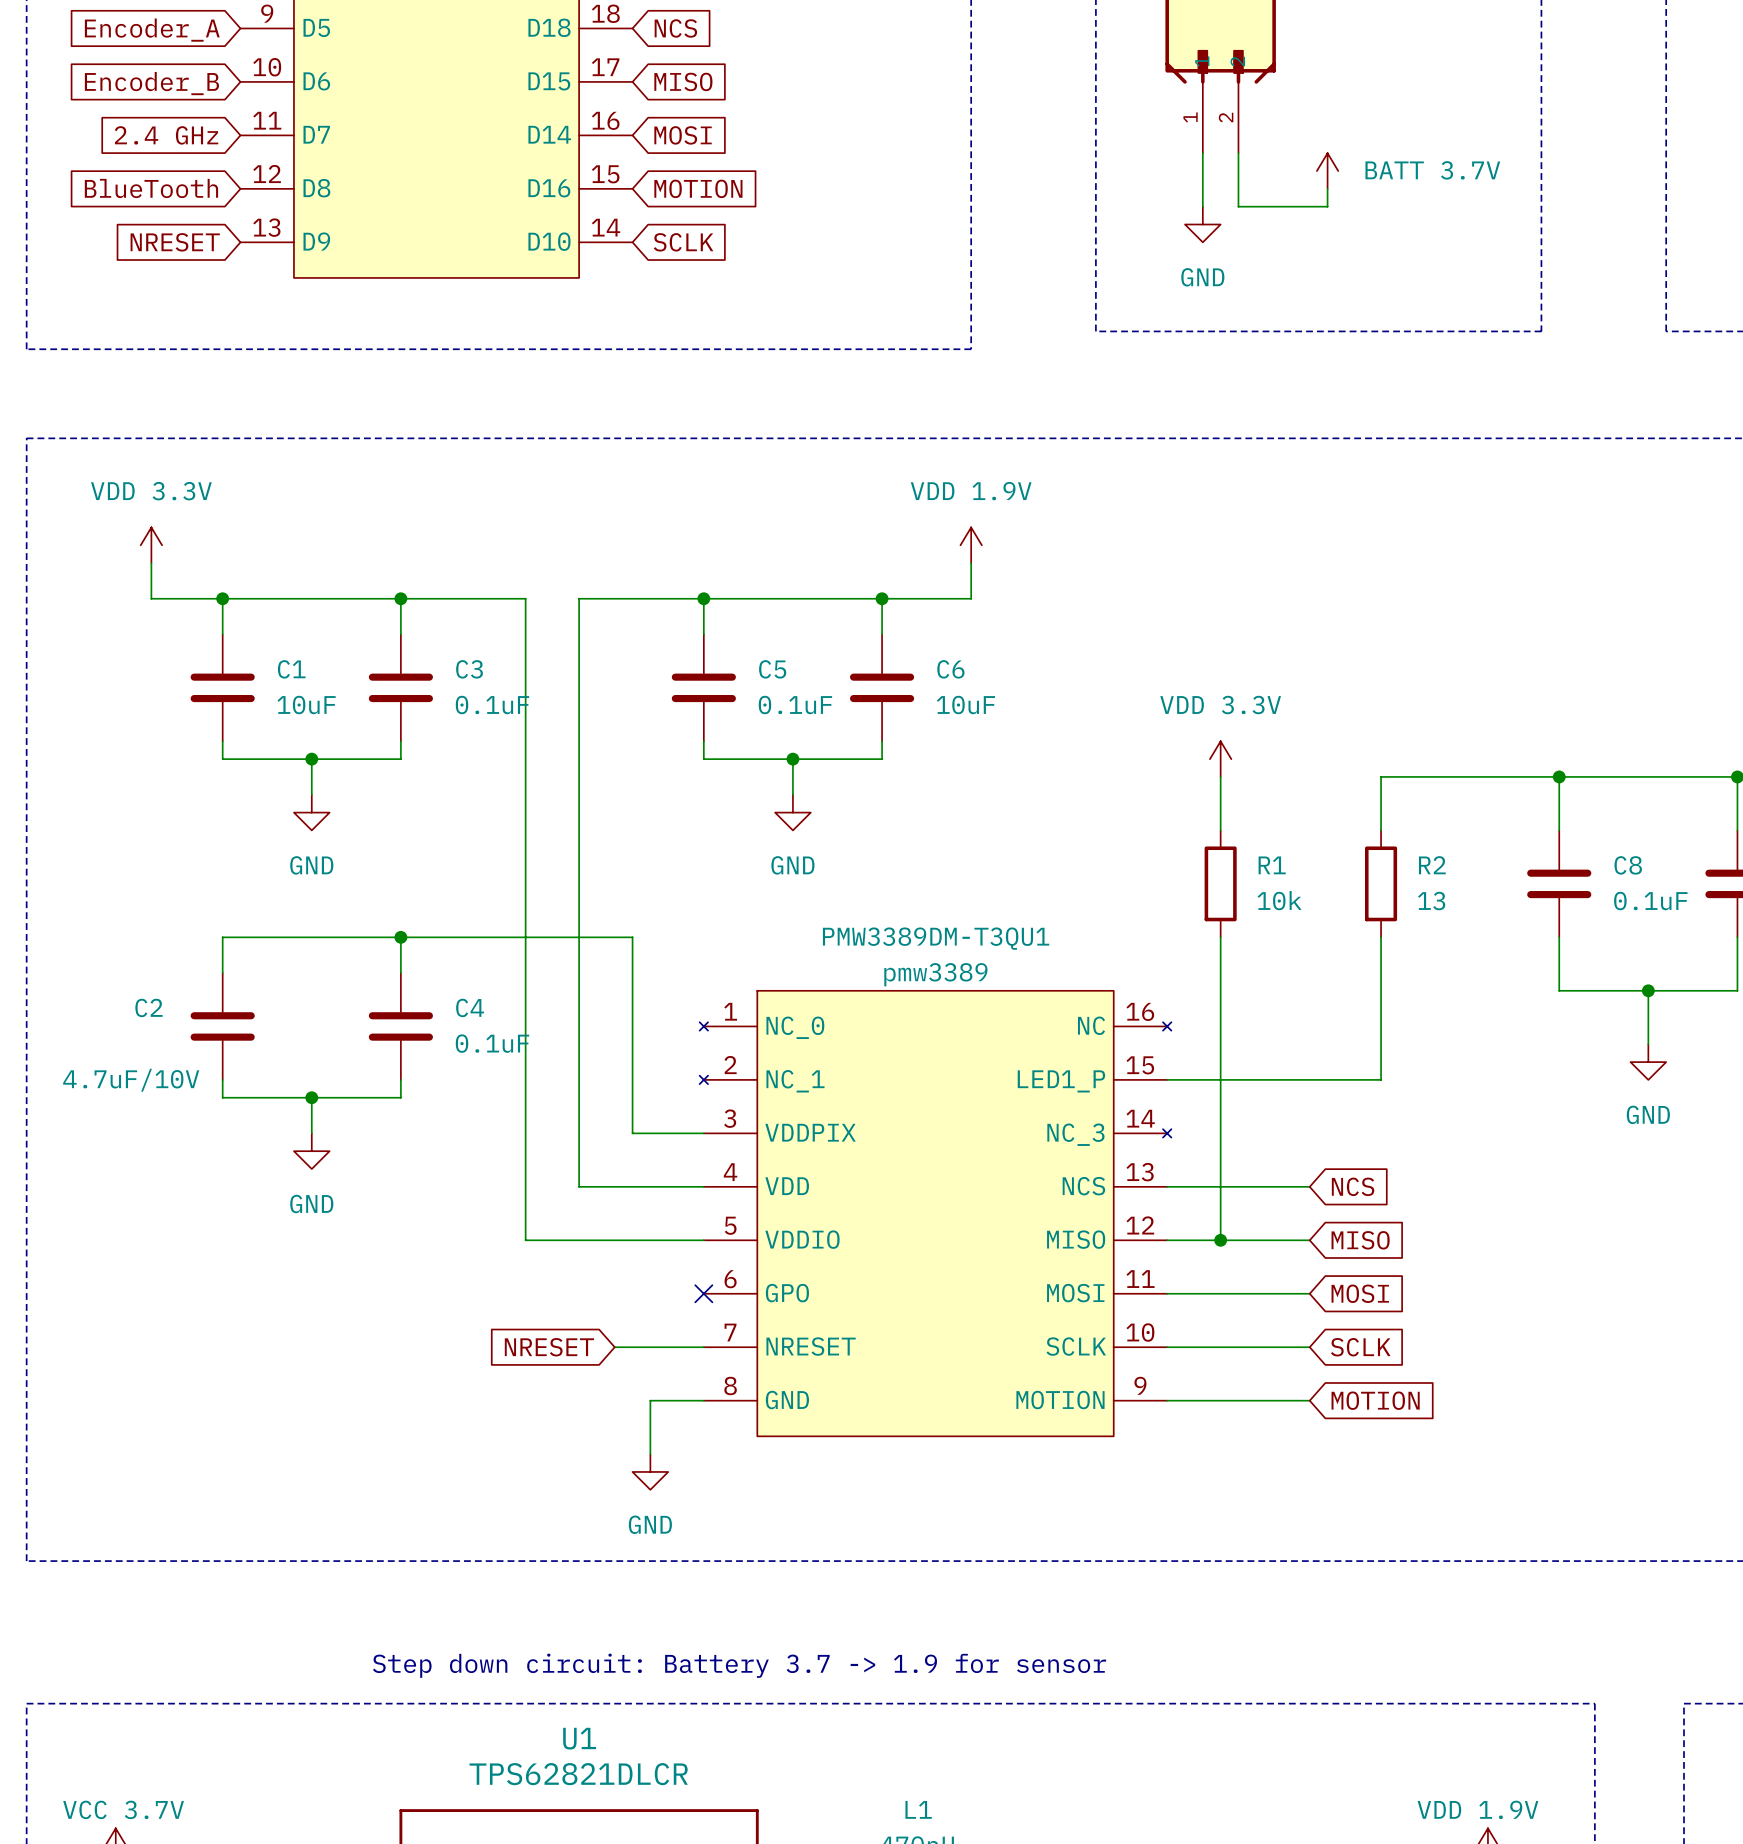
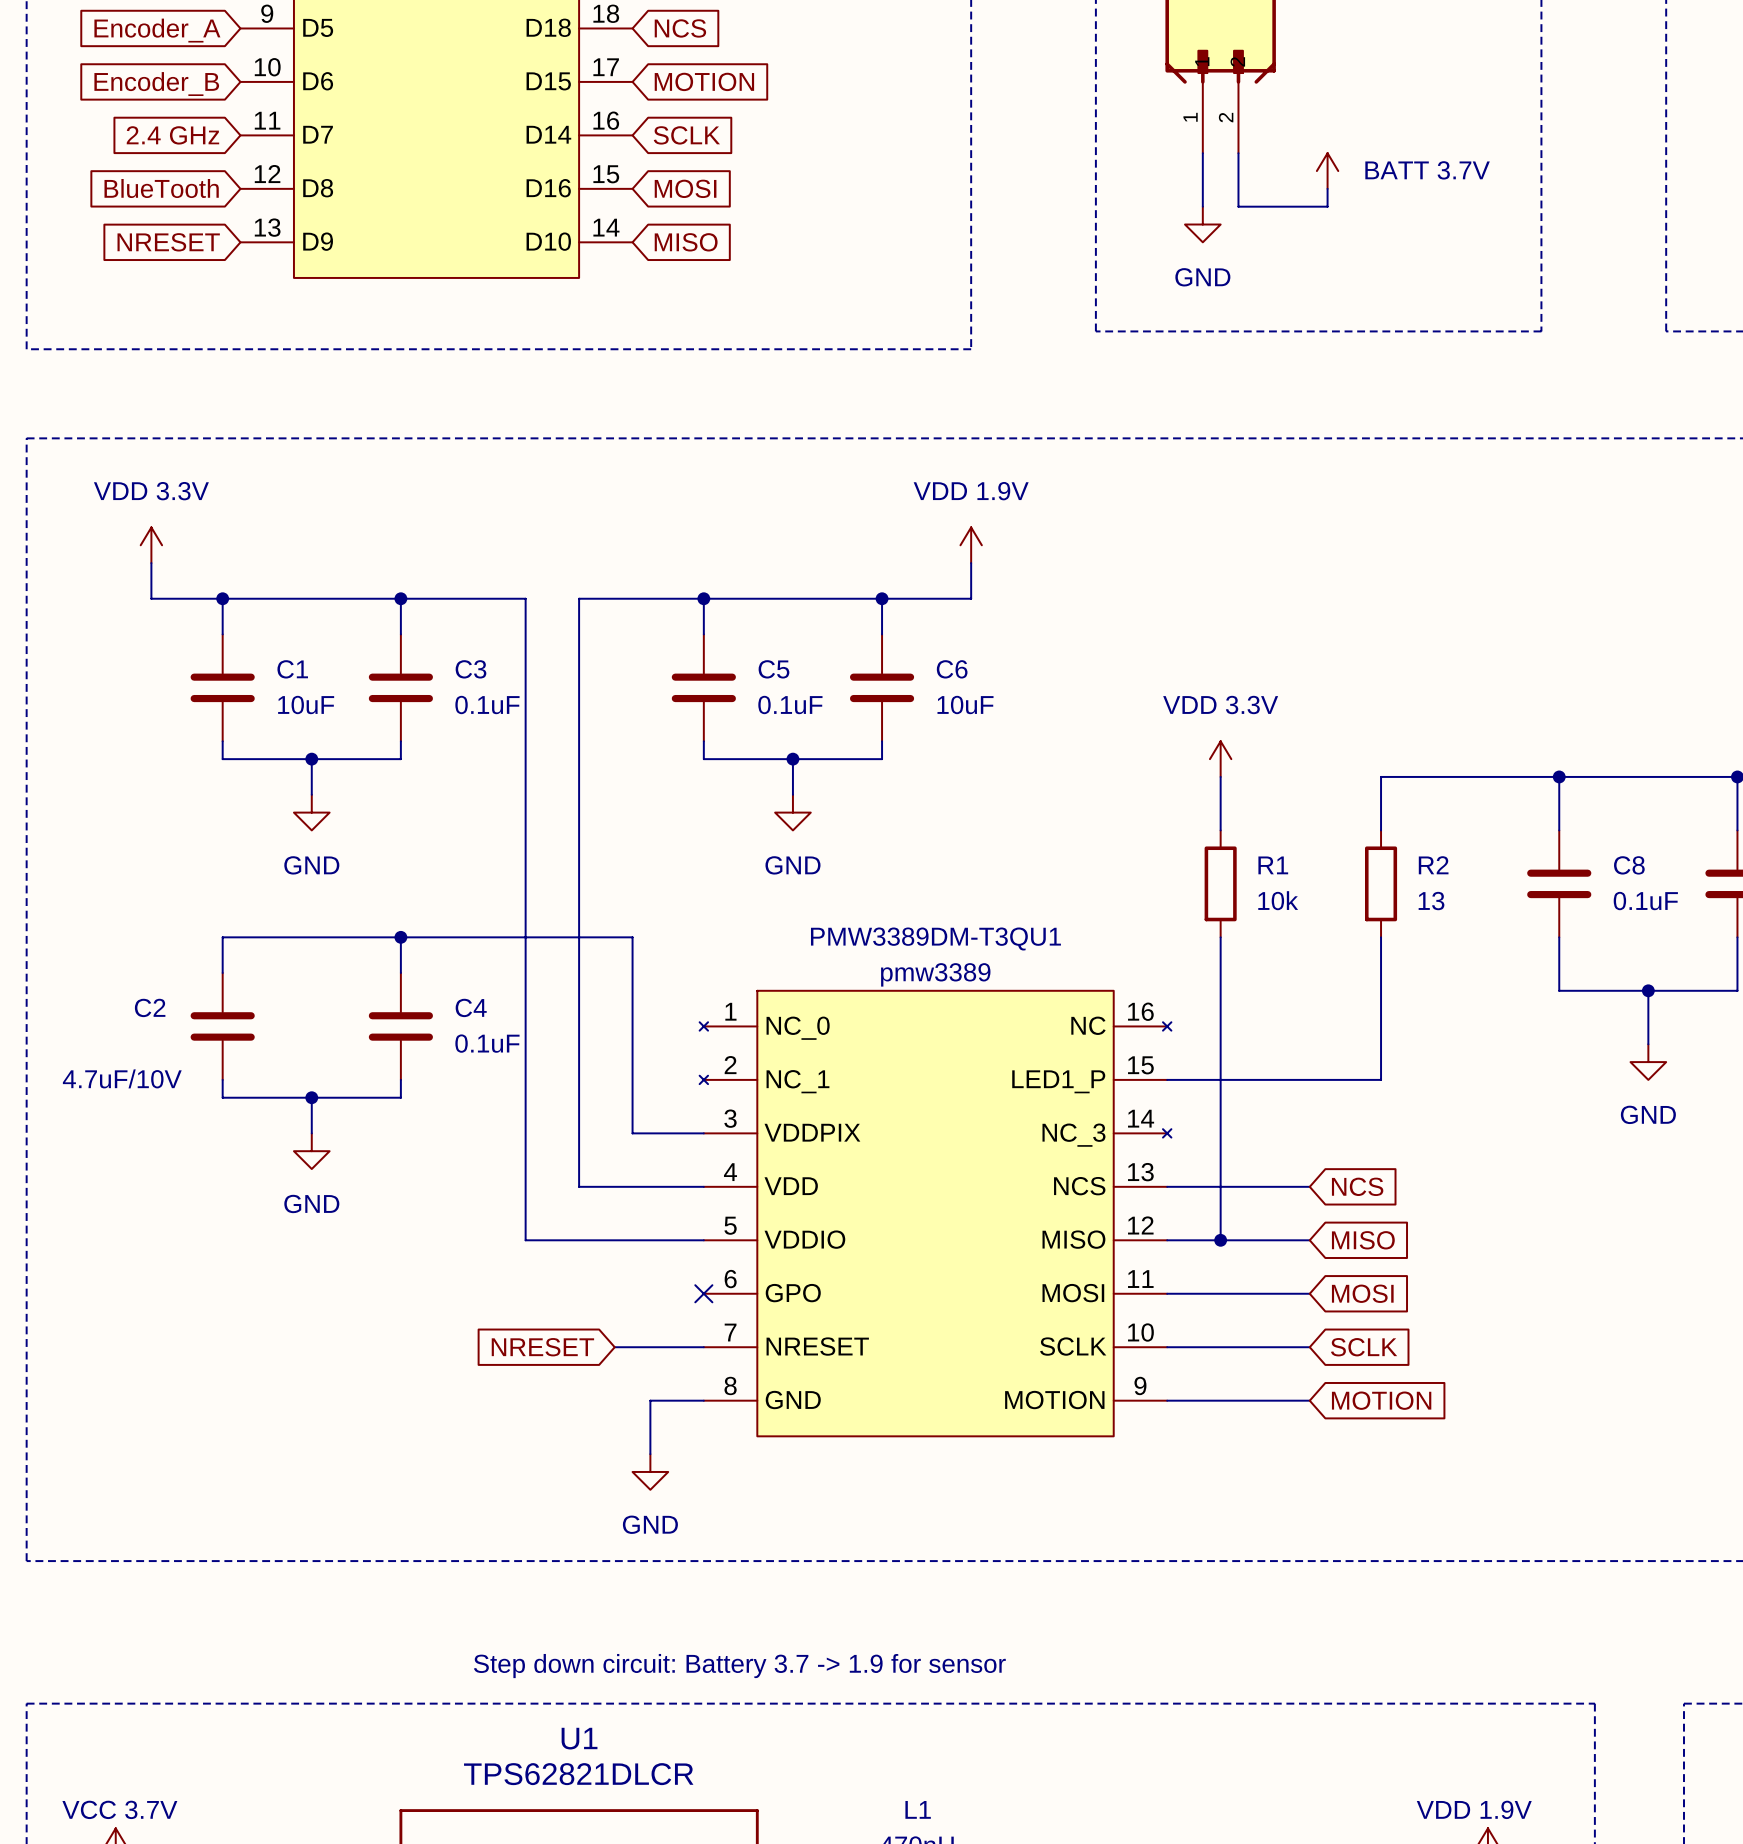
global label: MISO (683, 81) -> MOTION (704, 81)
global label: MOSI (683, 135) -> SCLK (686, 135)
global label: MOTION (698, 188) -> MOSI (685, 188)
global label: SCLK (683, 242) -> MISO (686, 242)

